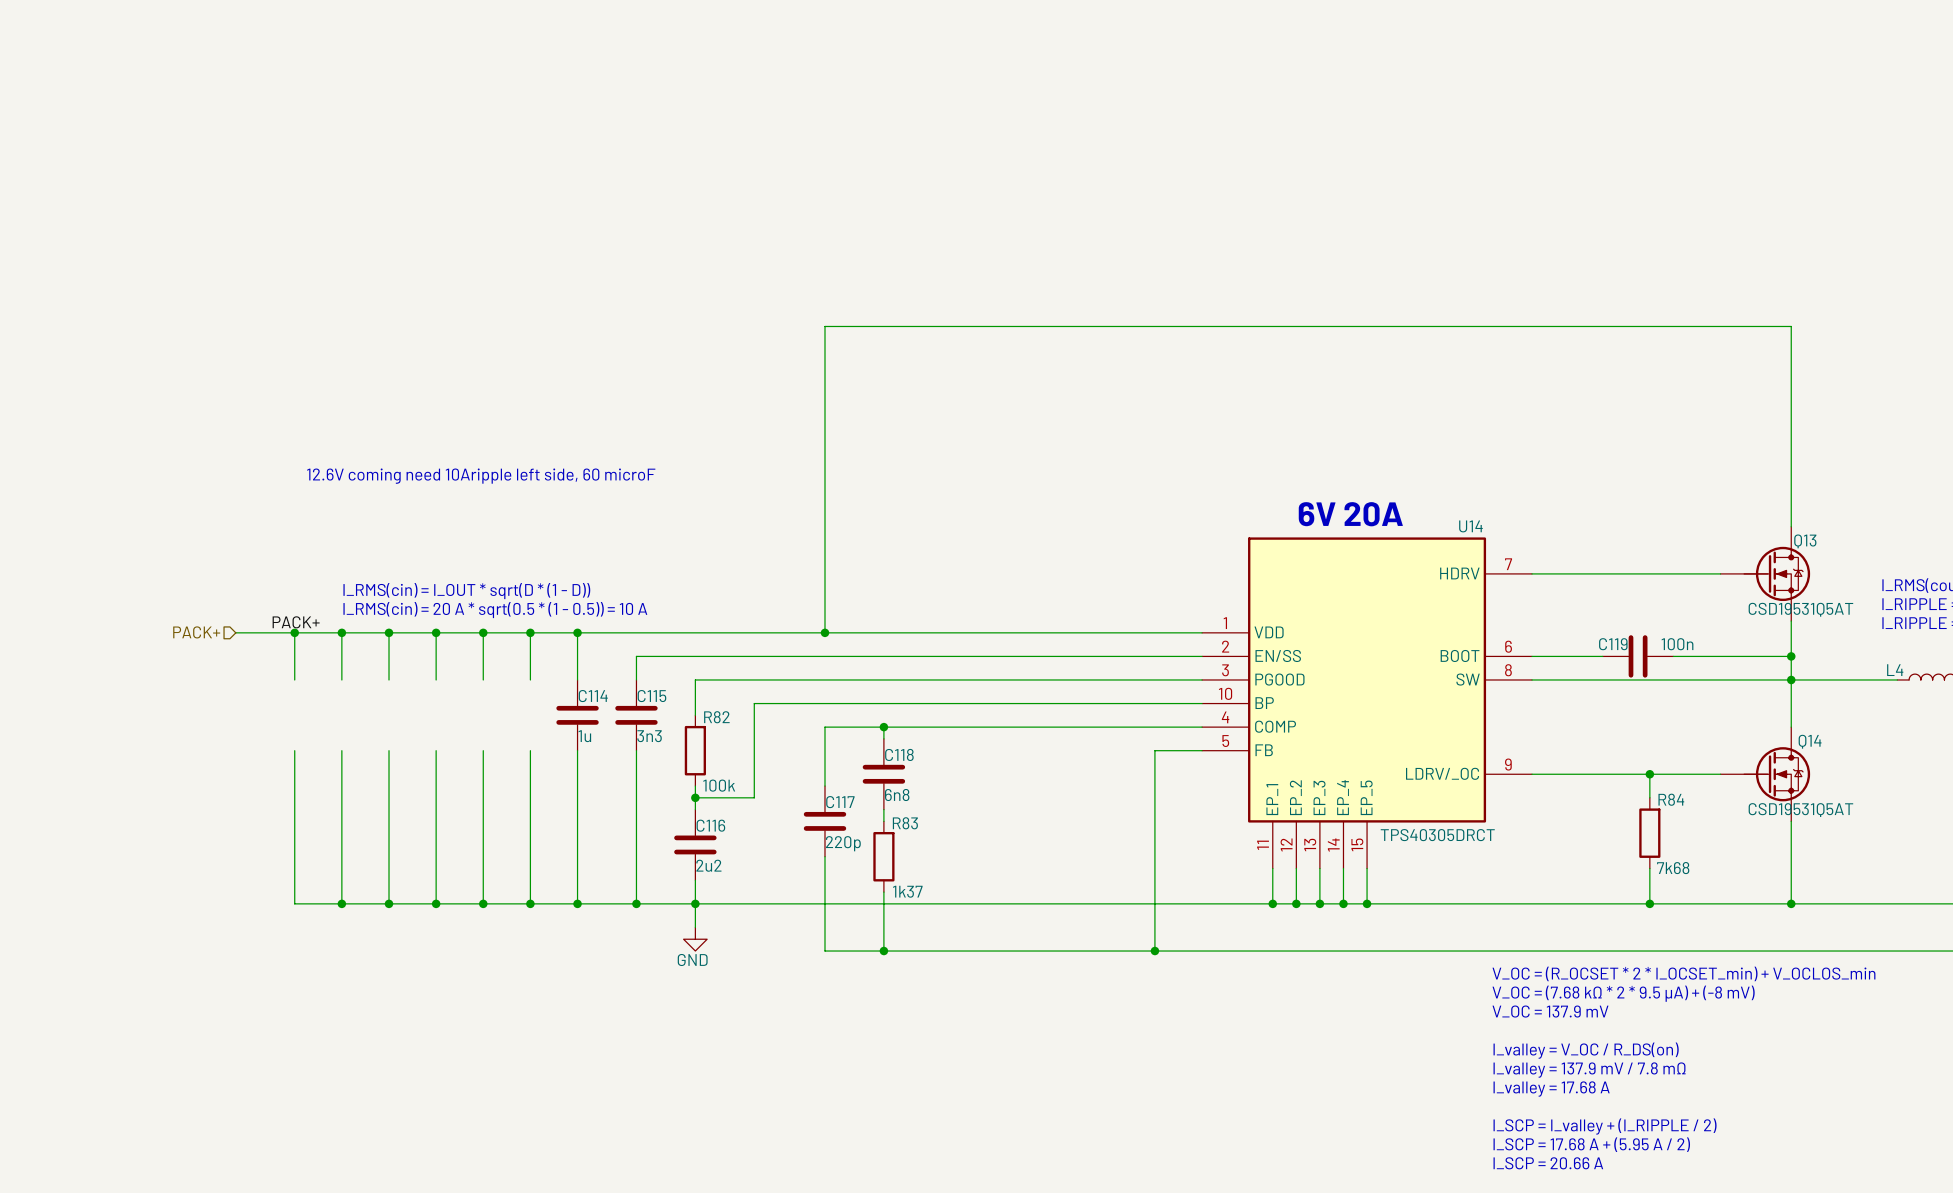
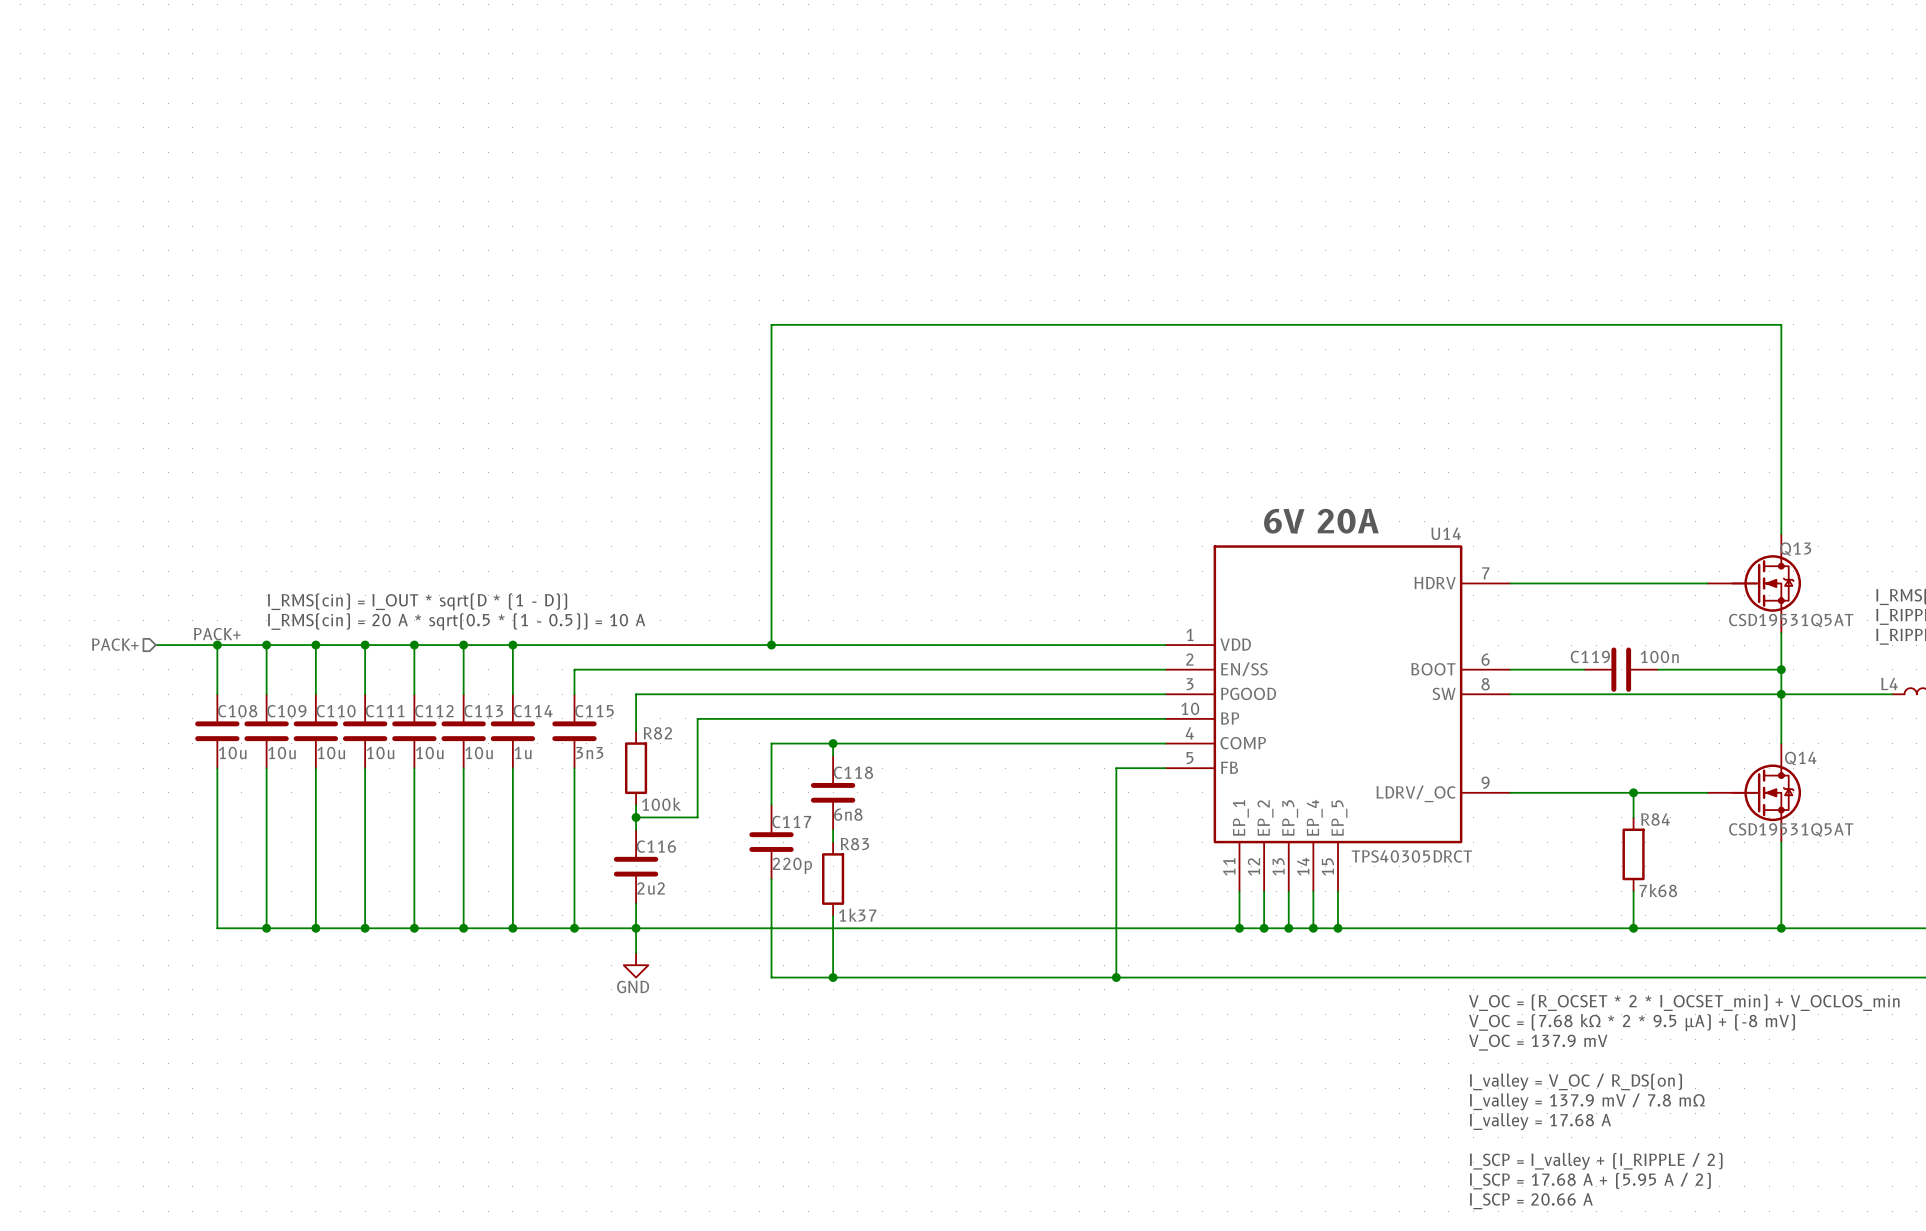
text: 12.6V coming need 10Aripple left side, 60 microF (481, 476) -> none
C108: none -> 10u (217, 731)
C109: none -> 10u (266, 731)
C110: none -> 10u (315, 731)
C111: none -> 10u (365, 731)
C112: none -> 10u (414, 731)
C113: none -> 10u (463, 731)

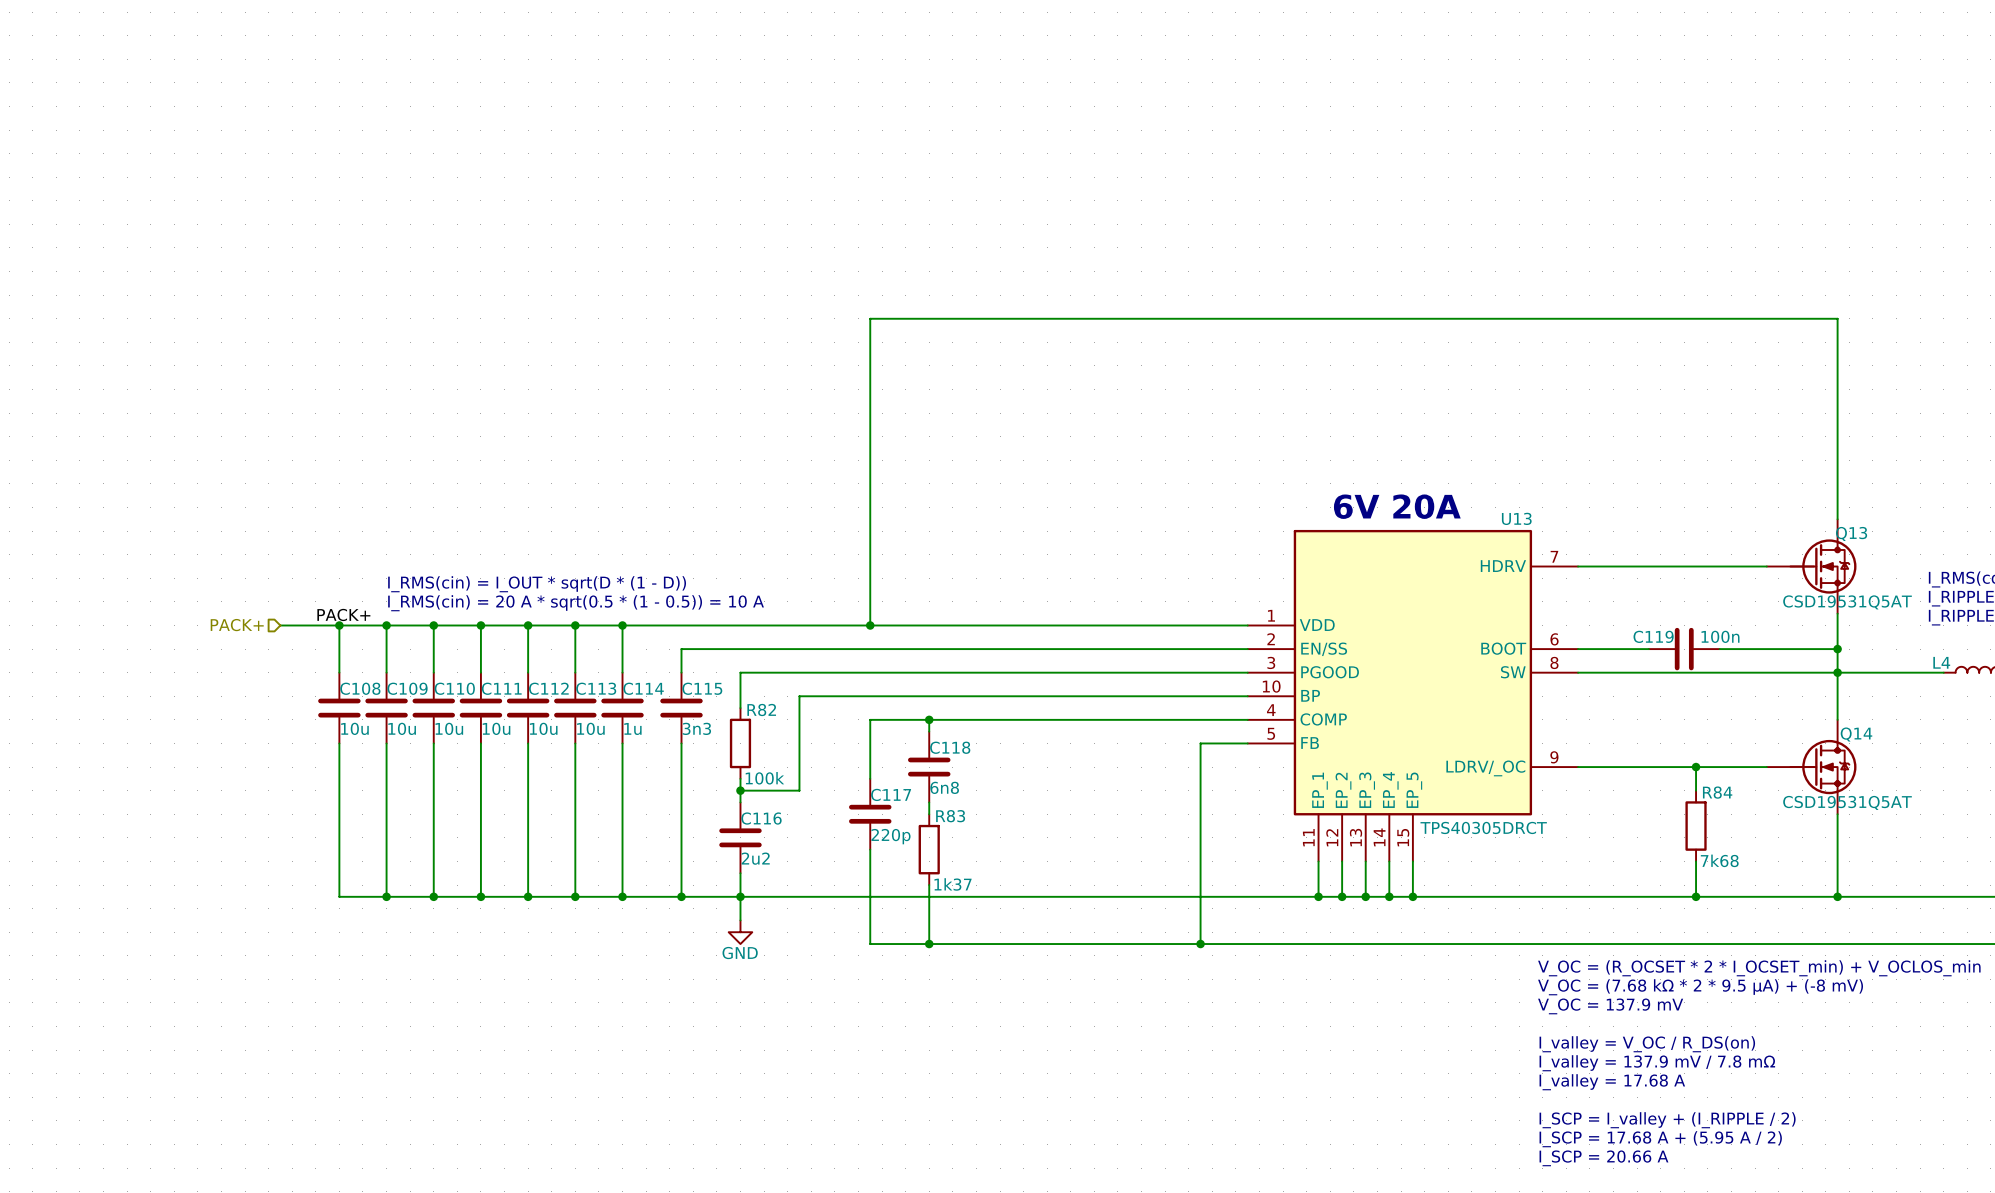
U14 name: U14 (1446, 533) -> U13 (1516, 518)

